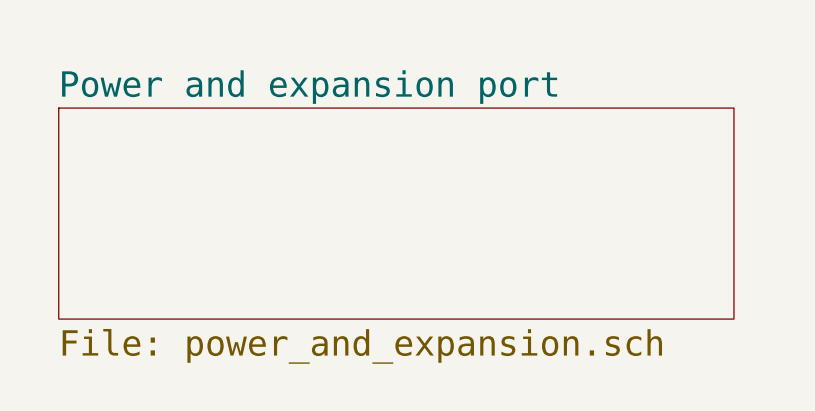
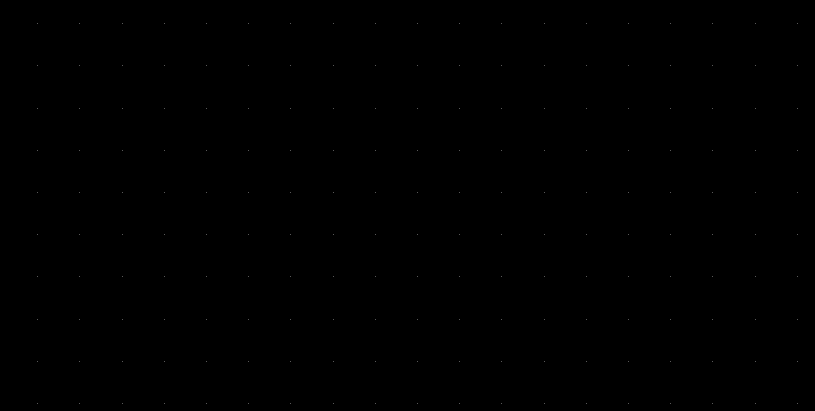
sheet Power and expansion port: File: power_and_expansion.sch (396, 213) -> none

